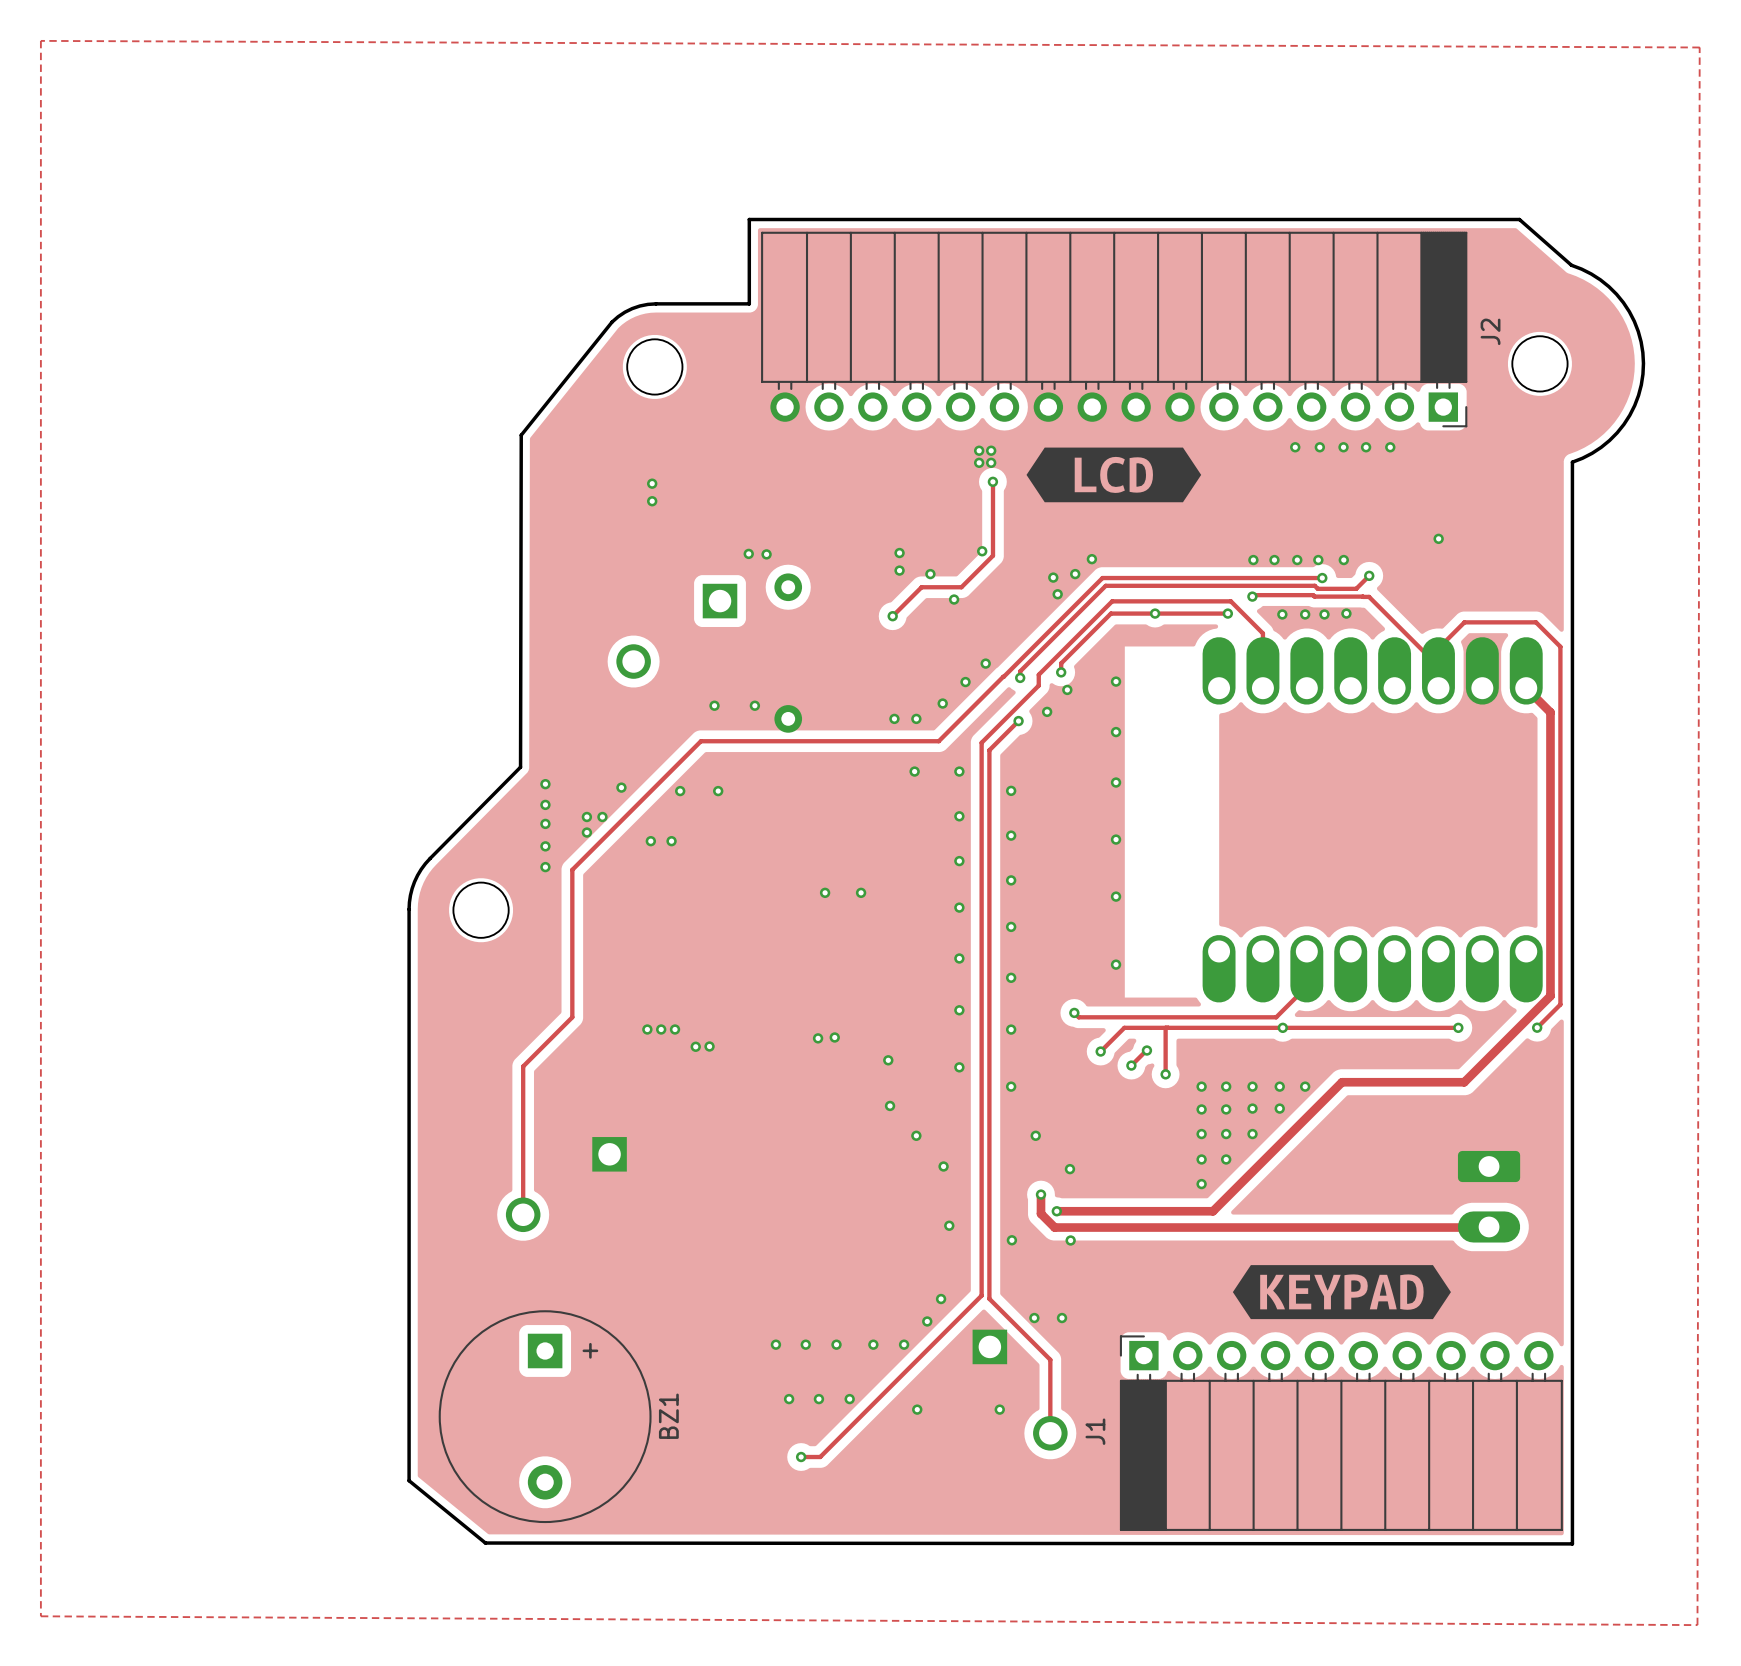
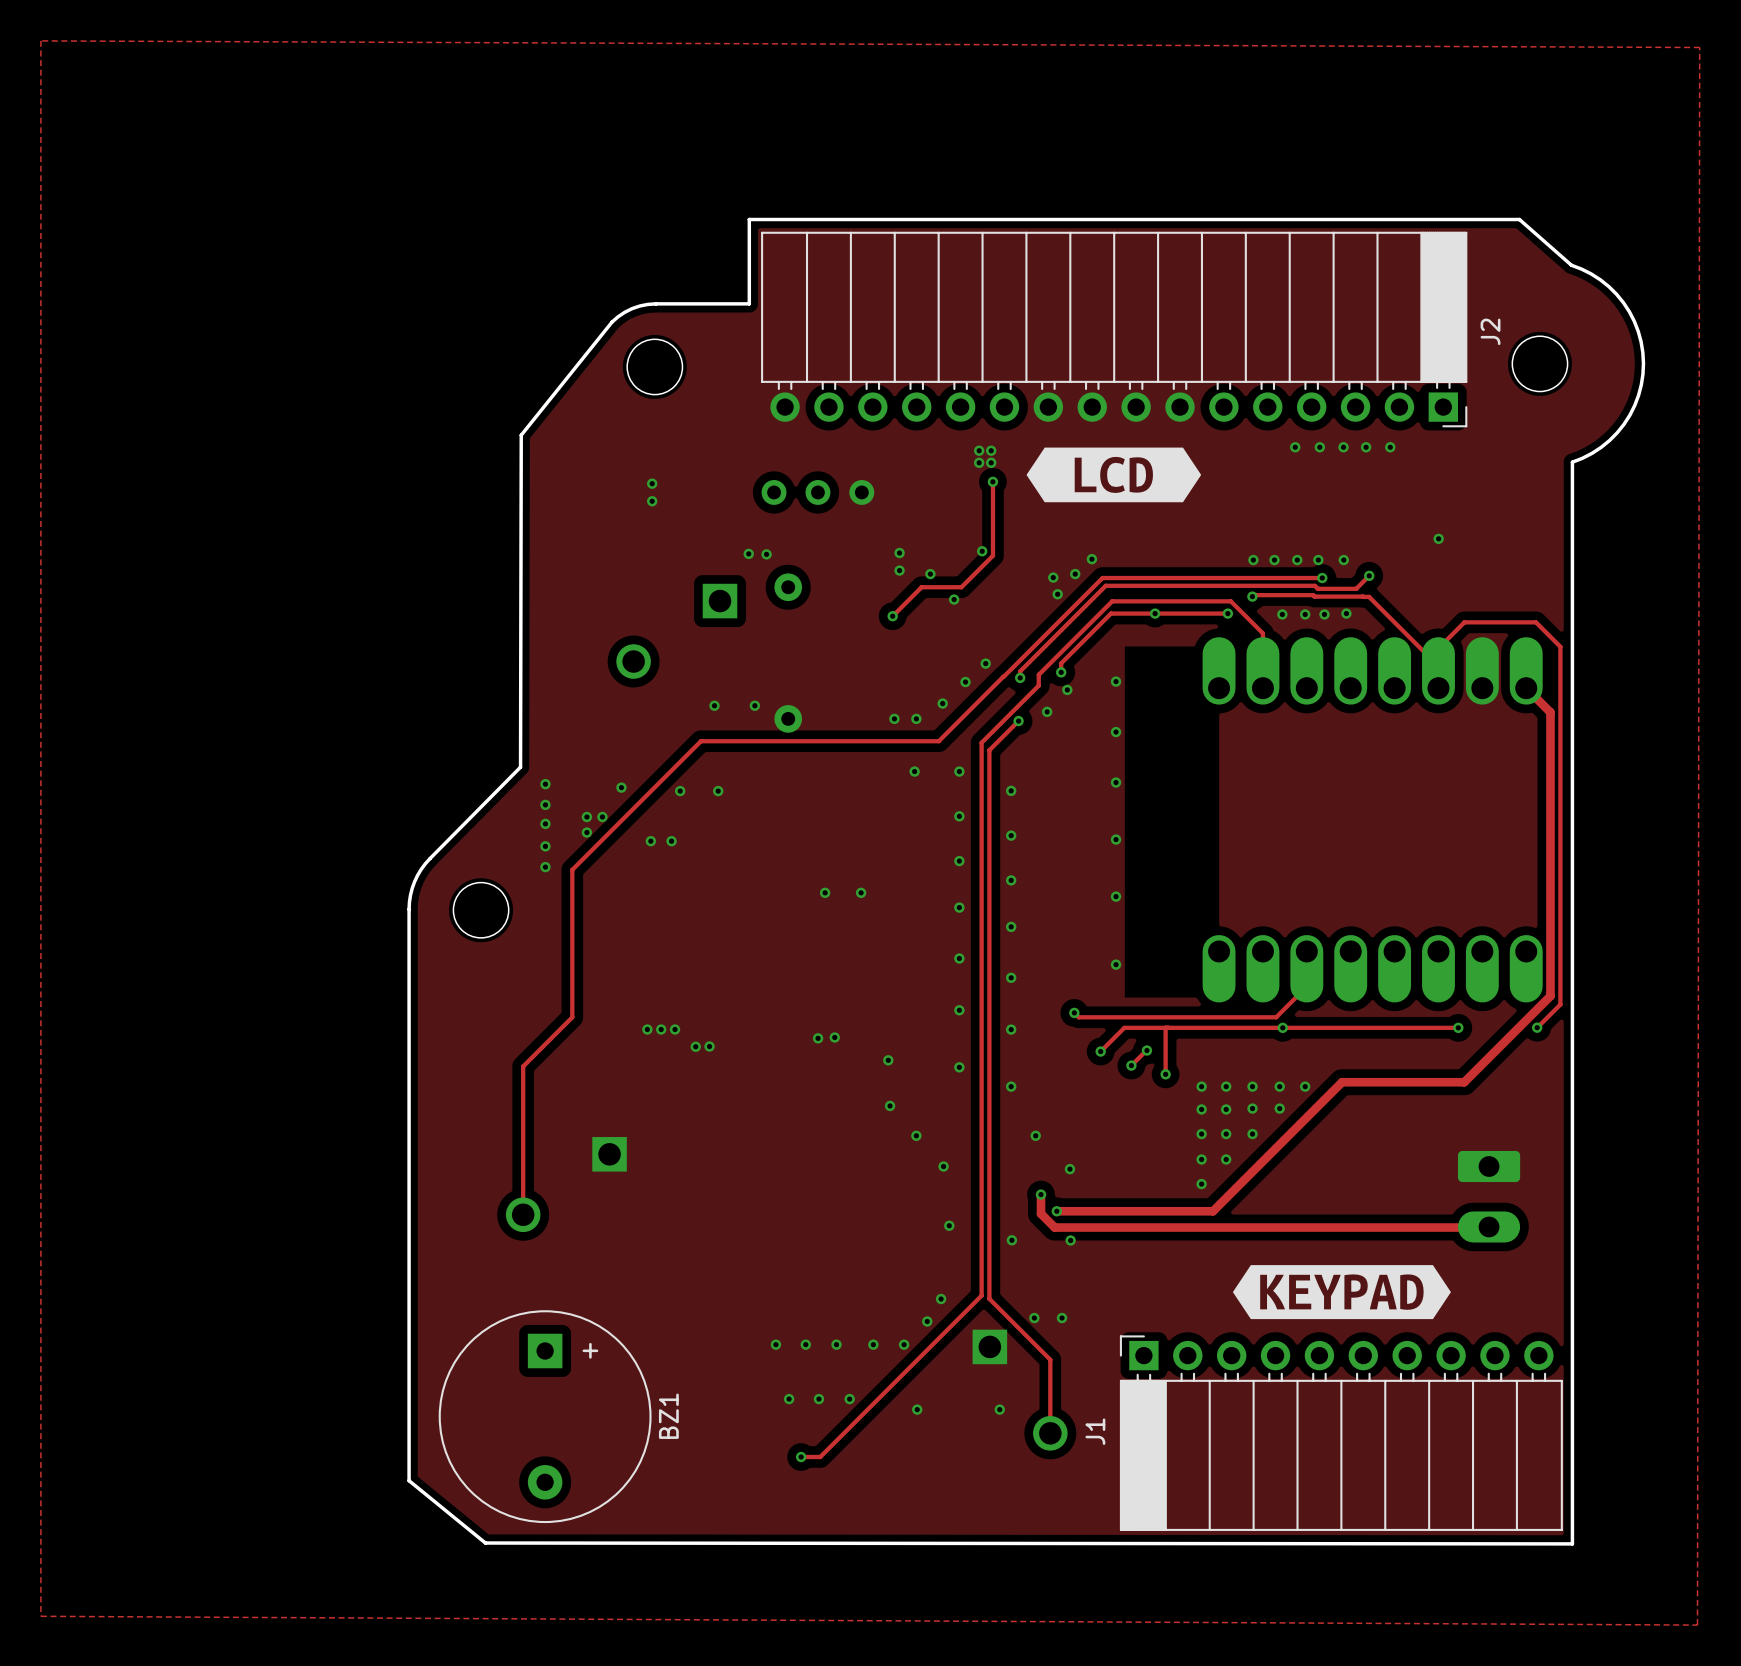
part: none -> (817, 492)

